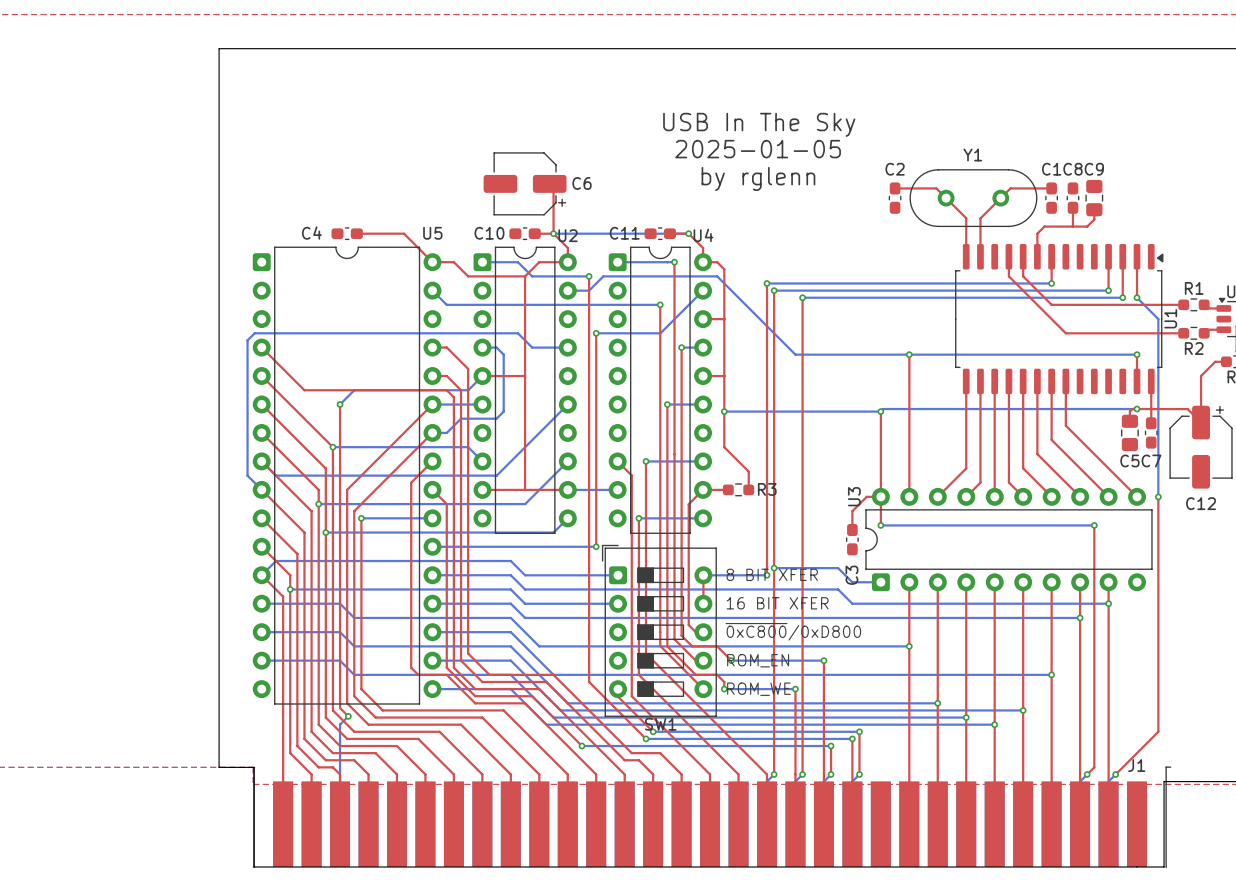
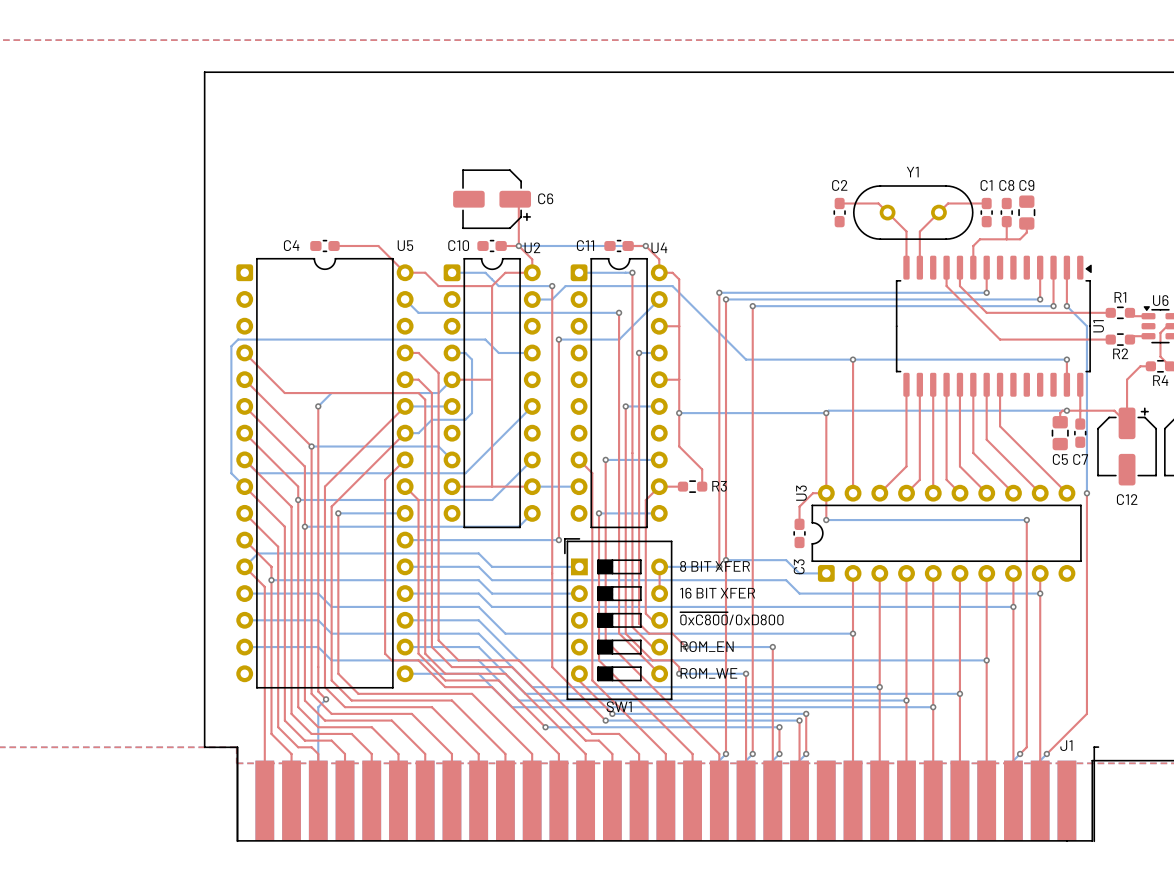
text: USB In The Sky (759, 124) -> none
text: 2025-01-05 (758, 149) -> none
text: by rglenn (758, 178) -> none
SW1 footprint: [601, 544, 717, 717] -> [564, 538, 673, 700]

